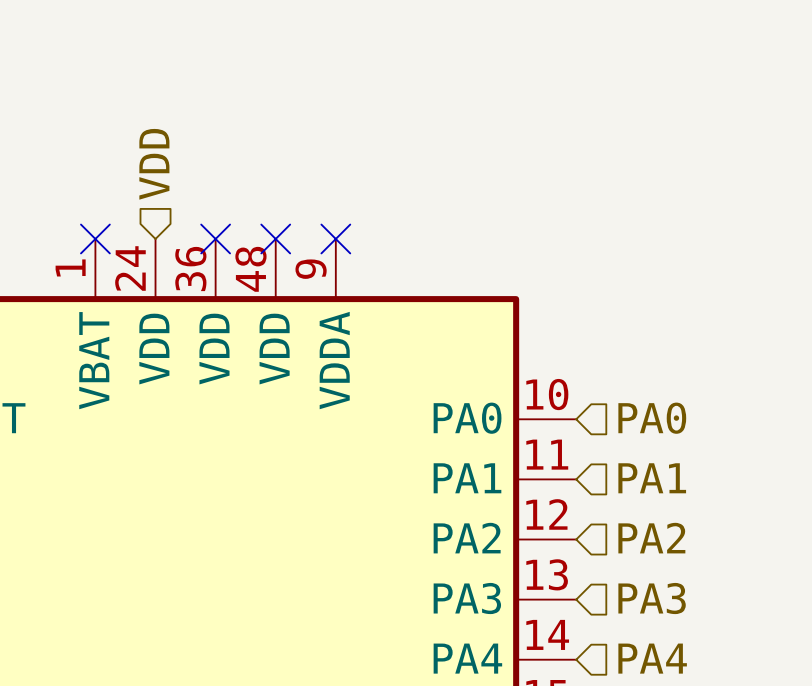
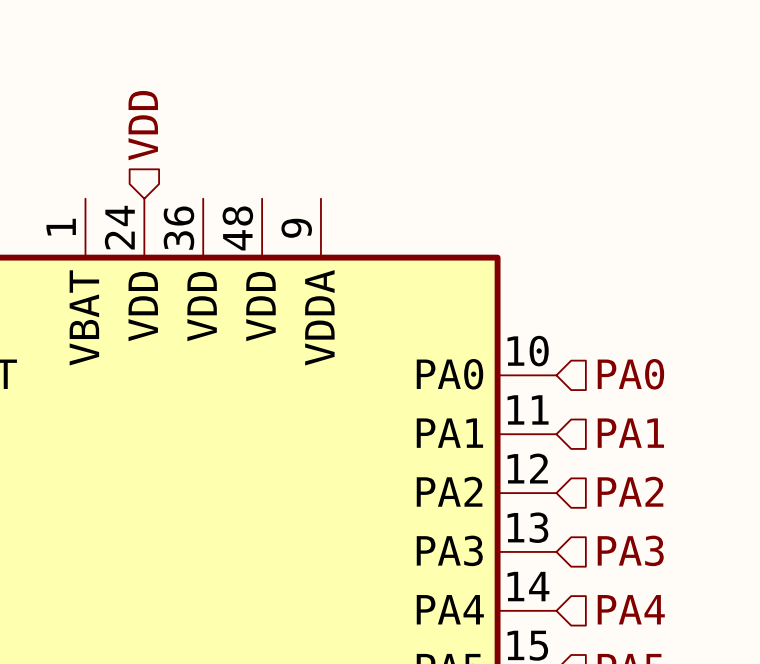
no-connect mark: (95, 238) -> none
no-connect mark: (215, 238) -> none
no-connect mark: (275, 238) -> none
no-connect mark: (335, 238) -> none

